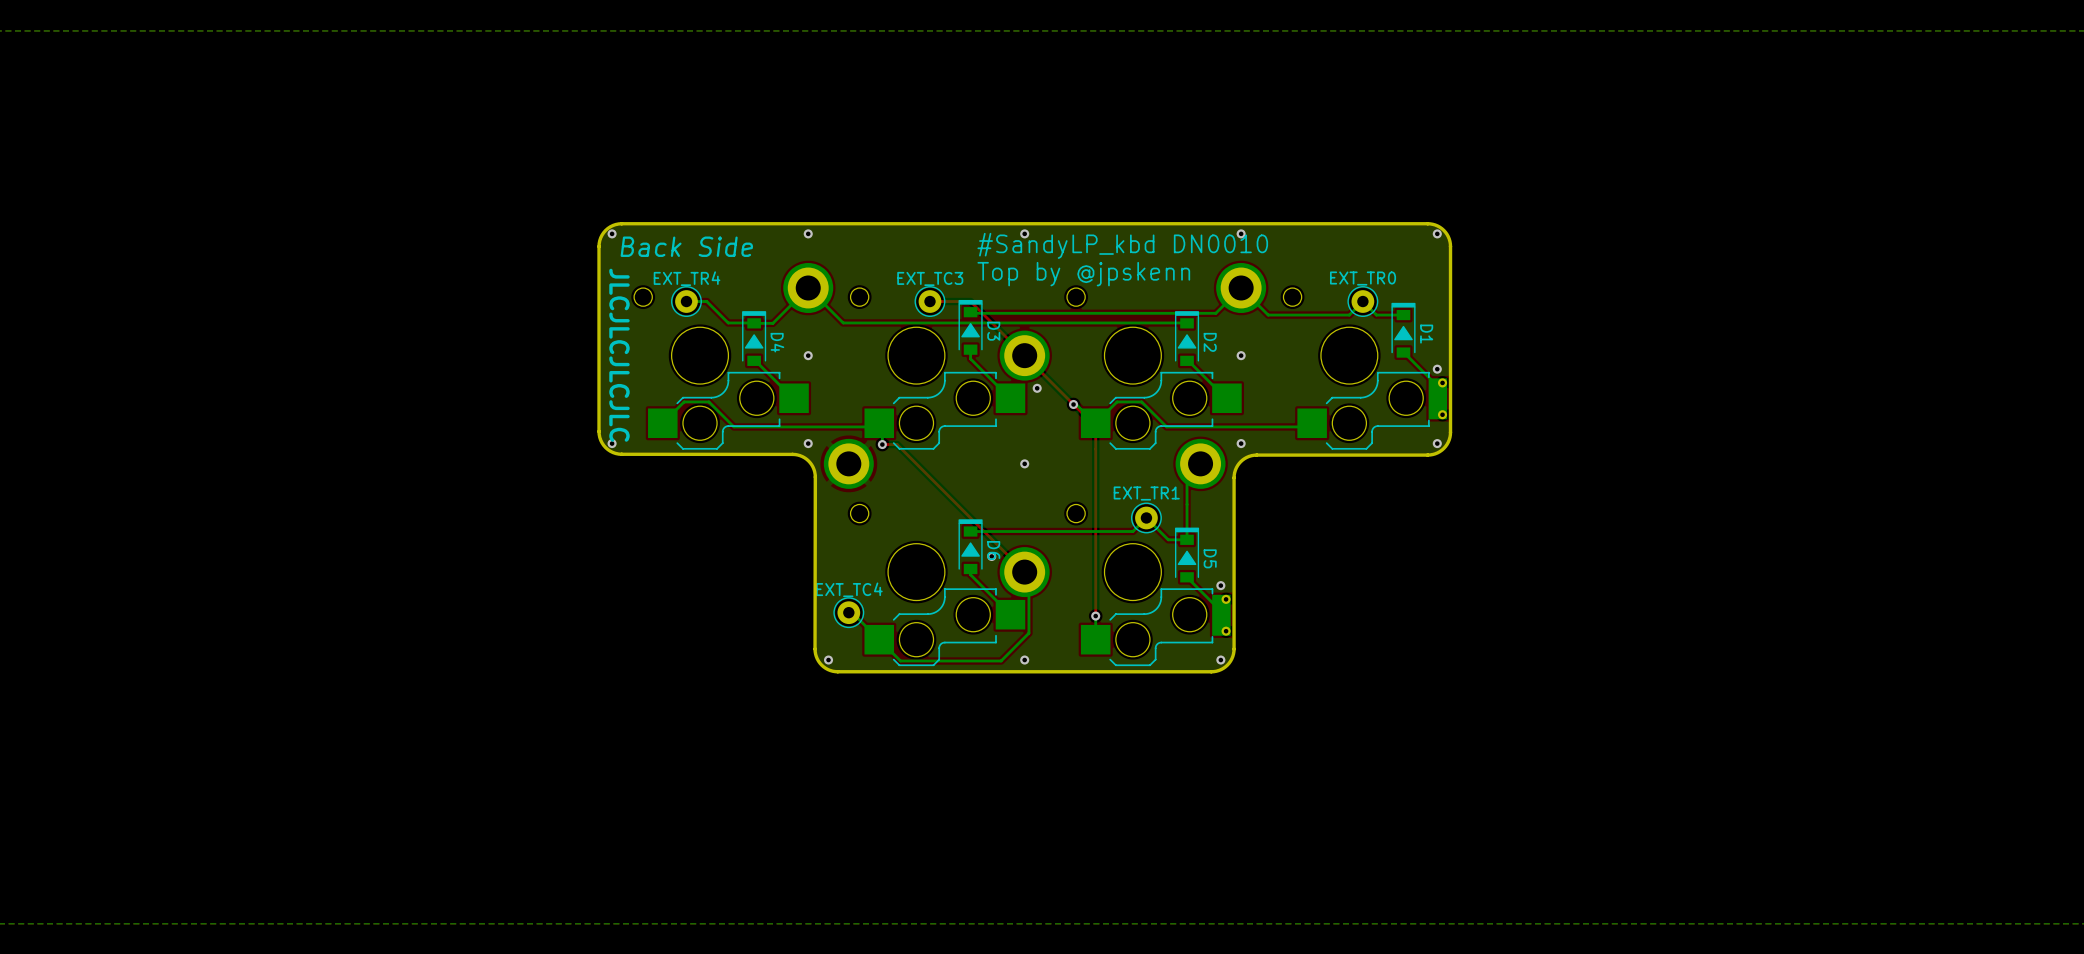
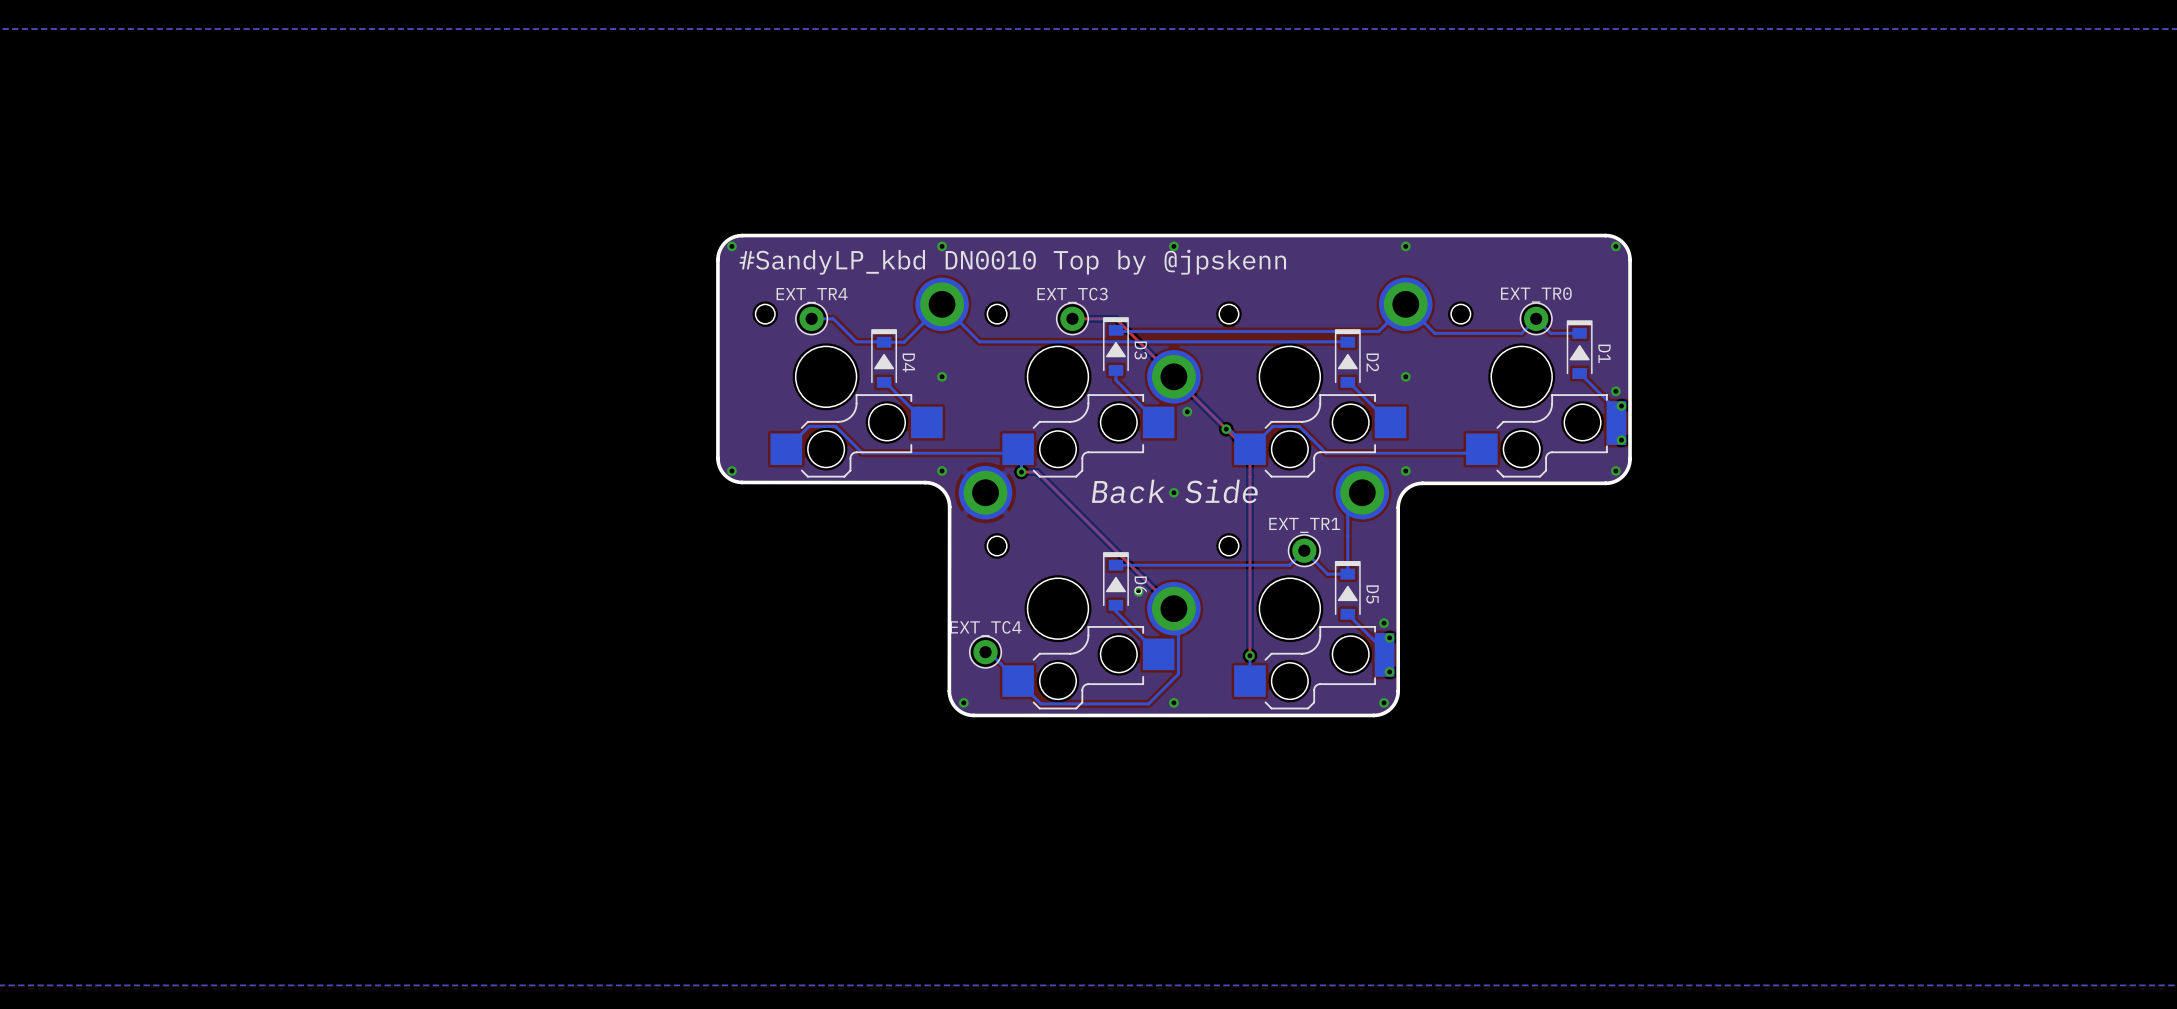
text: #SandyLP_kbd DN0010 (1122, 245) -> none
text: Back Side (686, 246) -> none
text: none -> #SandyLP_kbd DN0010 Top by @jpskenn (1012, 262)
text: Top by @jpskenn (1083, 274) -> none
text: JLCJLCJLCJLC (619, 355) -> none
text: none -> Back Side (1174, 491)

